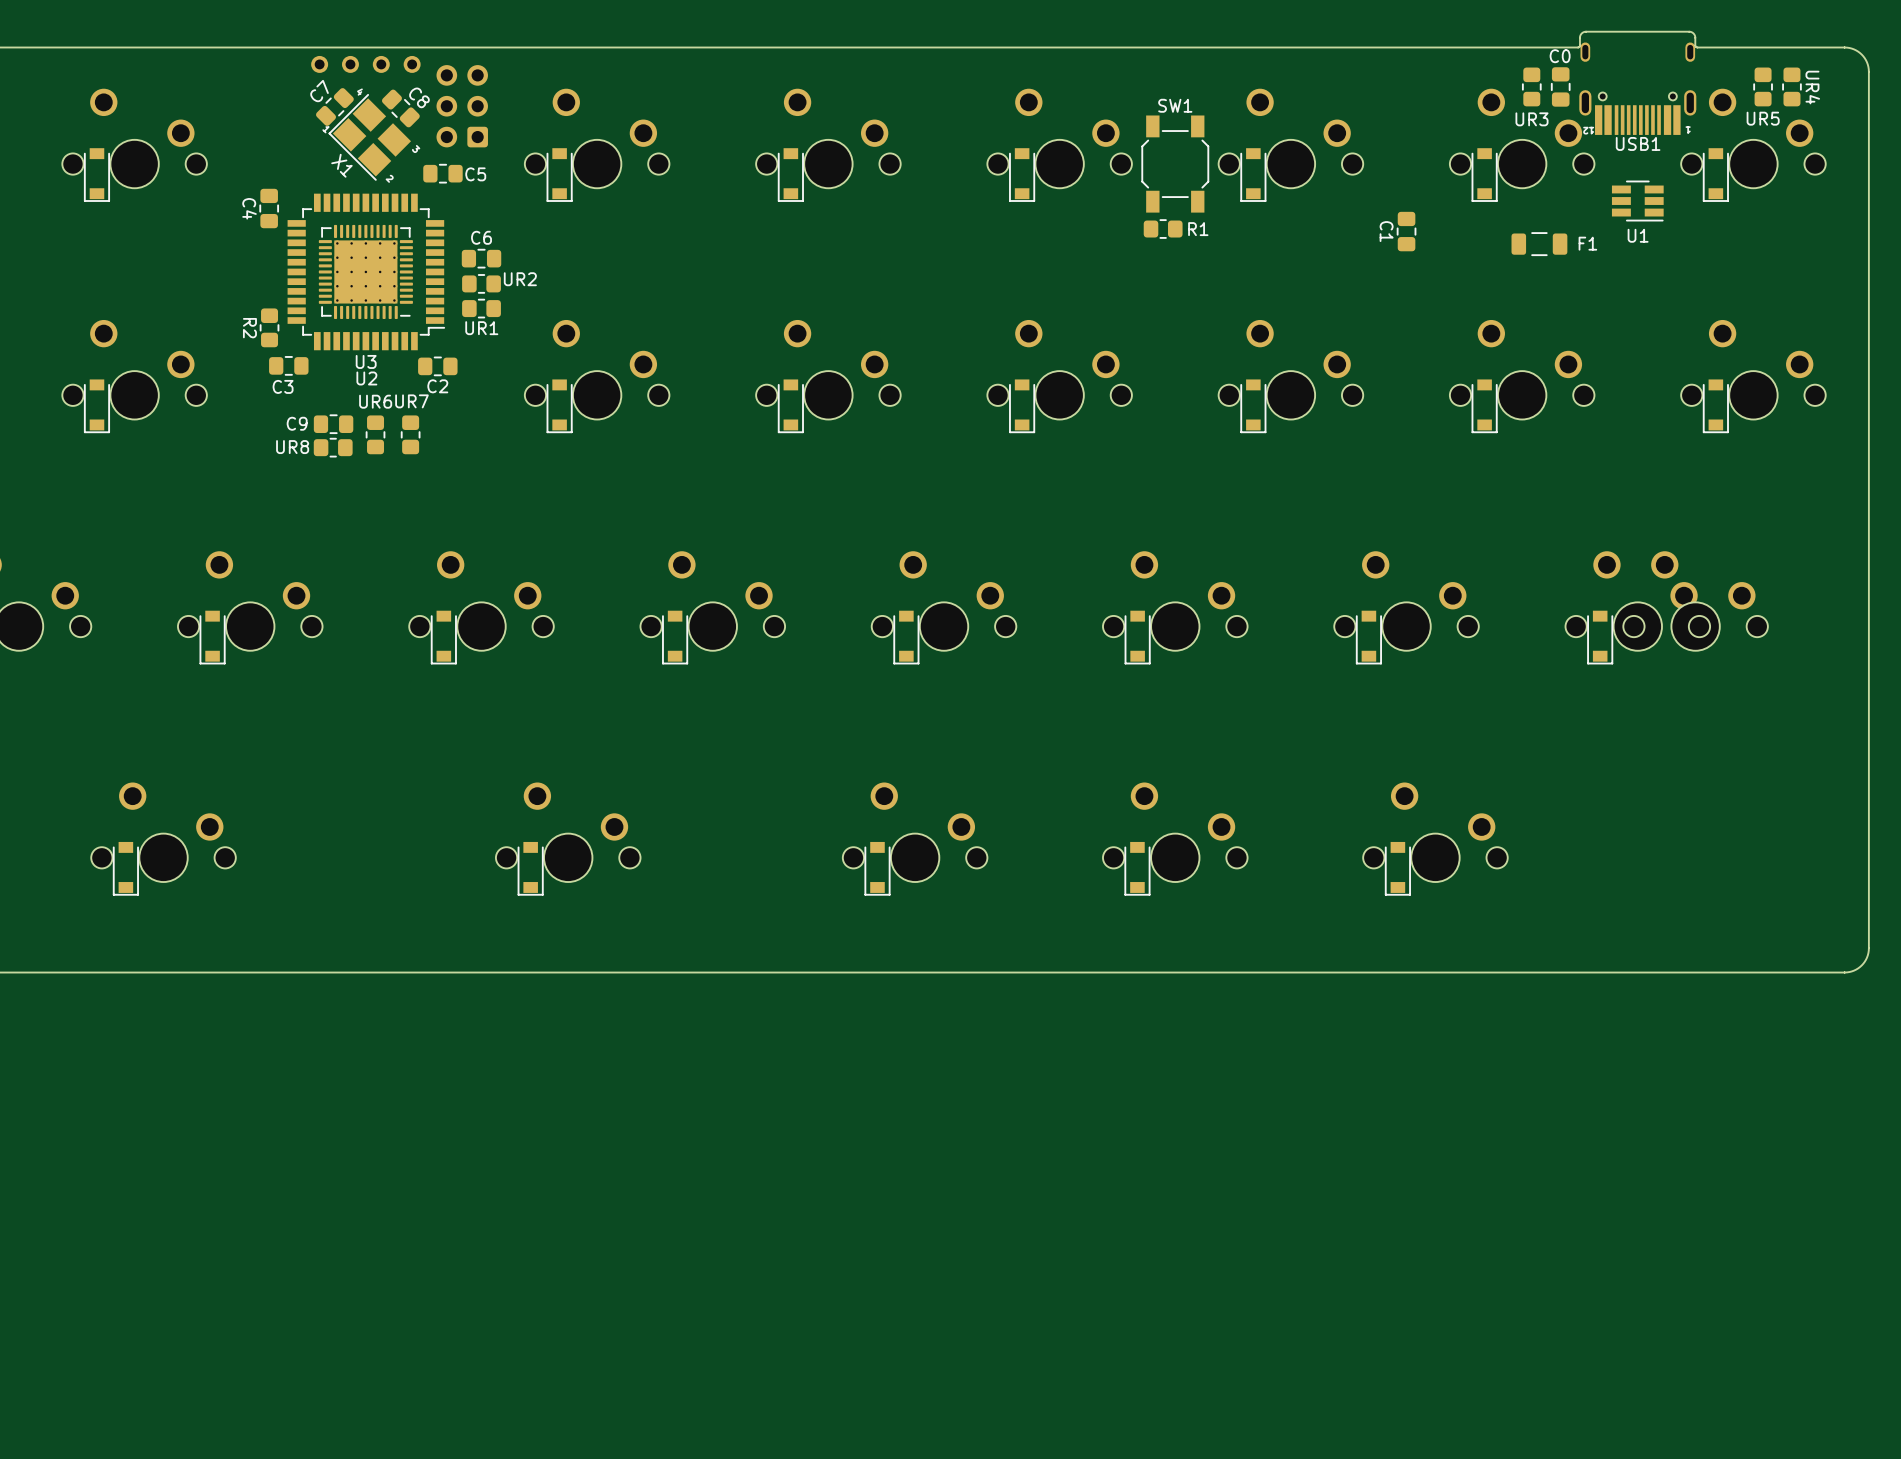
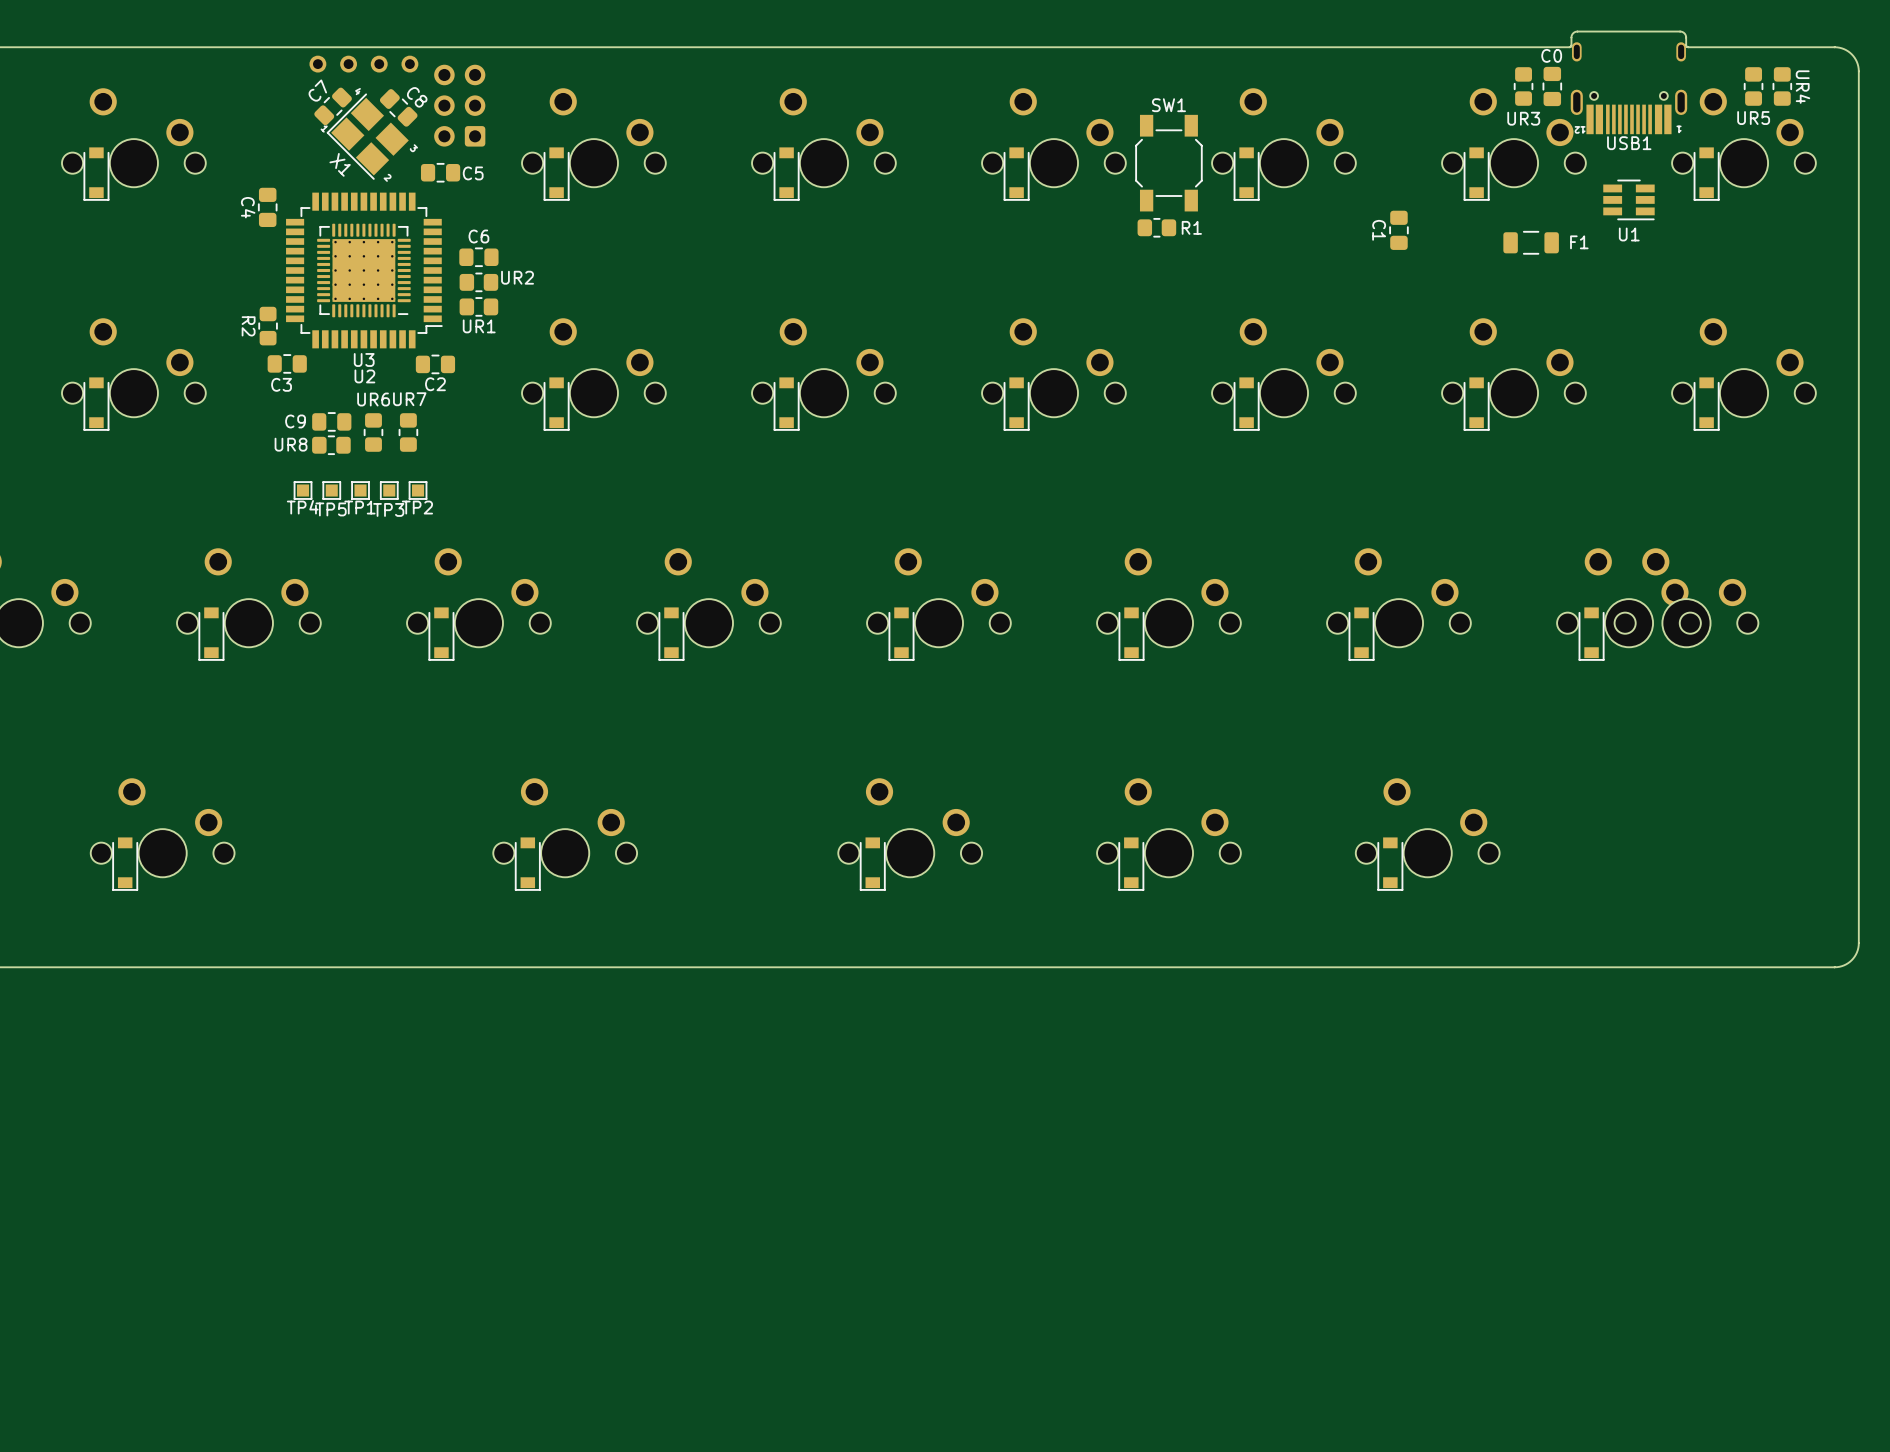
TP4: none -> (303, 490)
TP5: none -> (331, 490)
TP1: none -> (360, 490)
TP3: none -> (389, 490)
TP2: none -> (418, 490)

